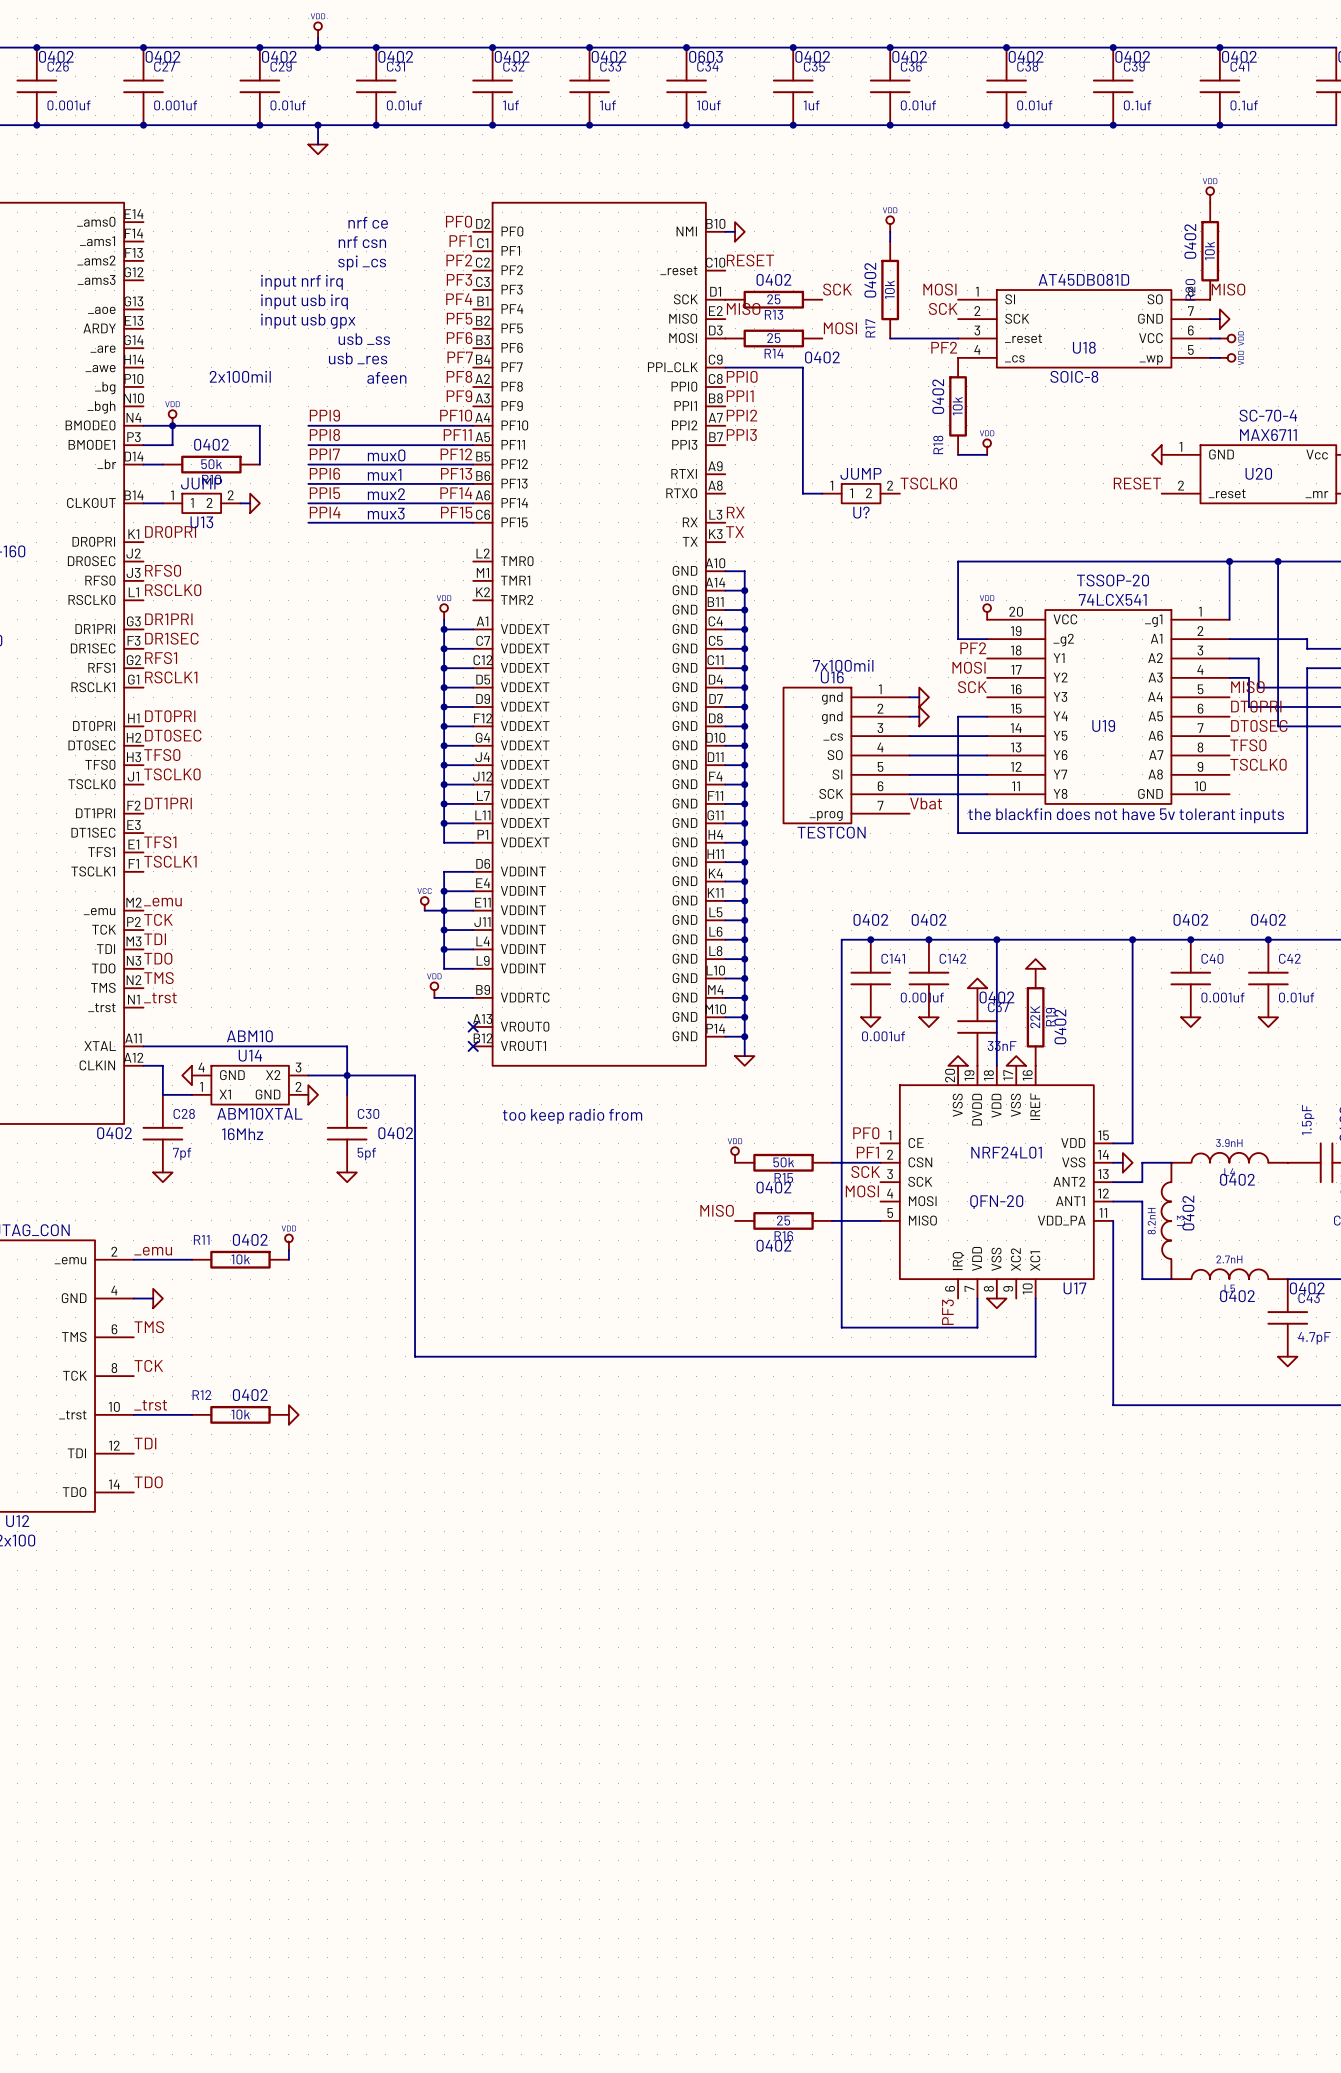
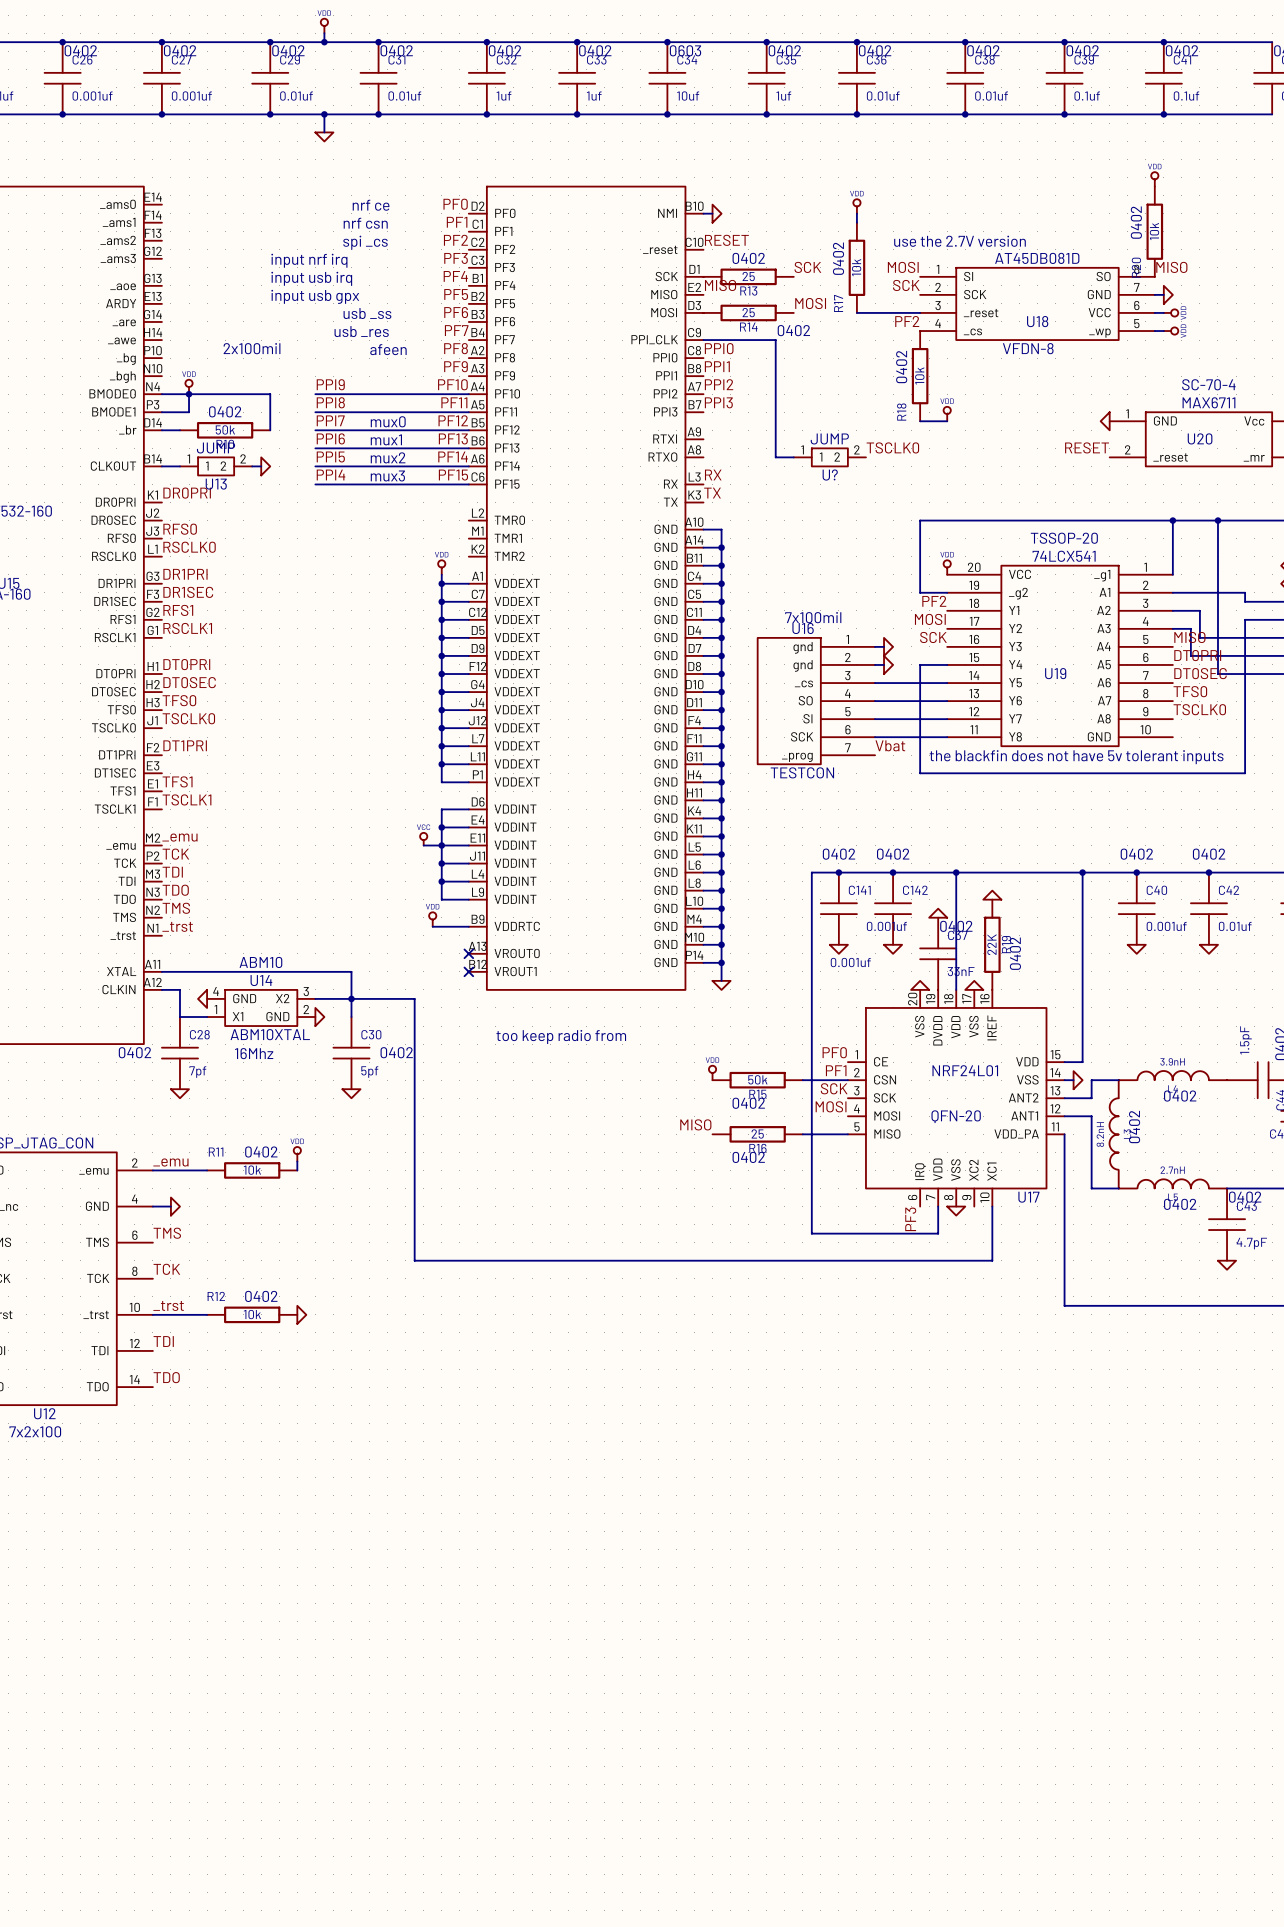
text: none -> use the 2.7V version (959, 241)
U18 text: SOIC-8 (1074, 376) -> VFDN-8 (1028, 348)

